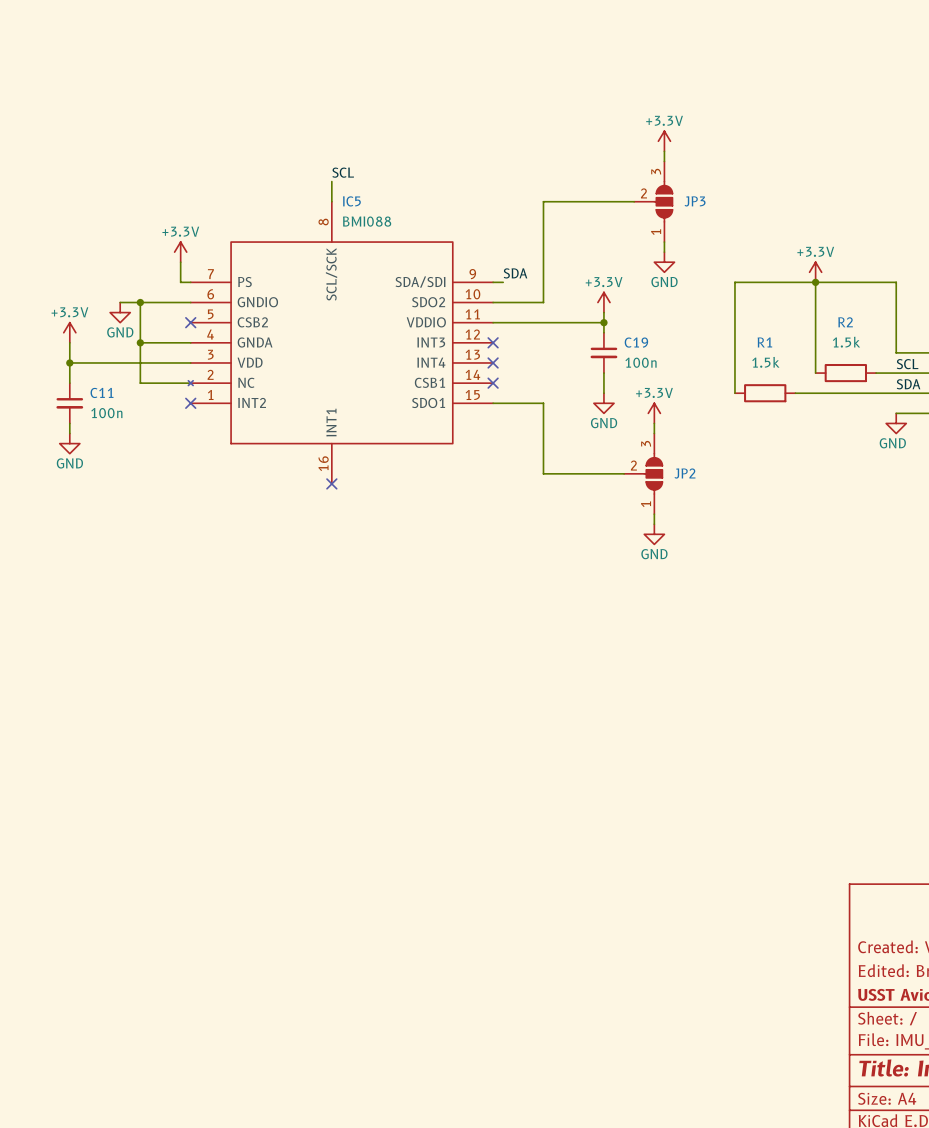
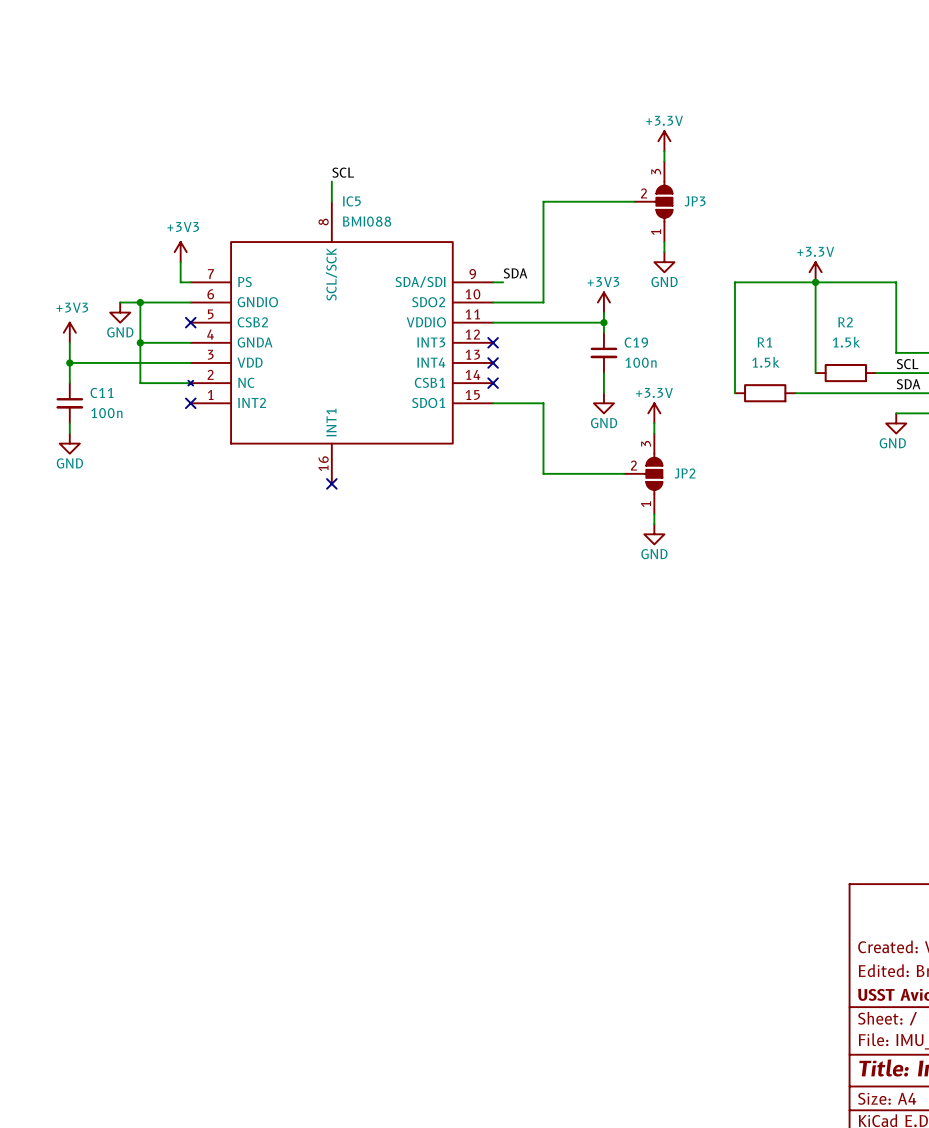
power symbol: +3.3V (180, 252) -> +3V3 (180, 252)
power symbol: +3.3V (603, 302) -> +3V3 (603, 302)
power symbol: +3.3V (69, 332) -> +3V3 (69, 332)

